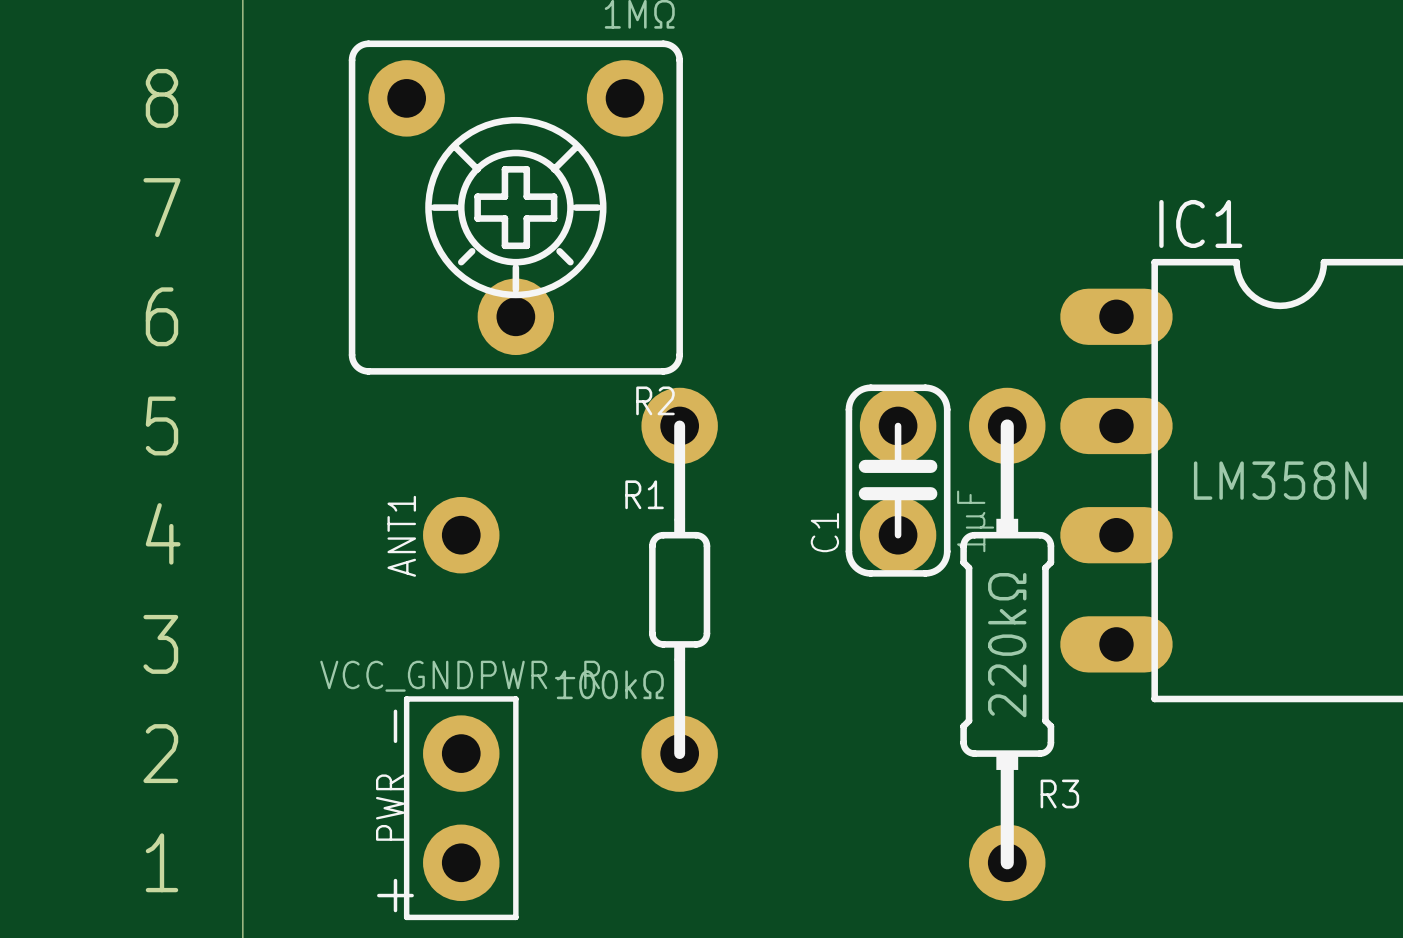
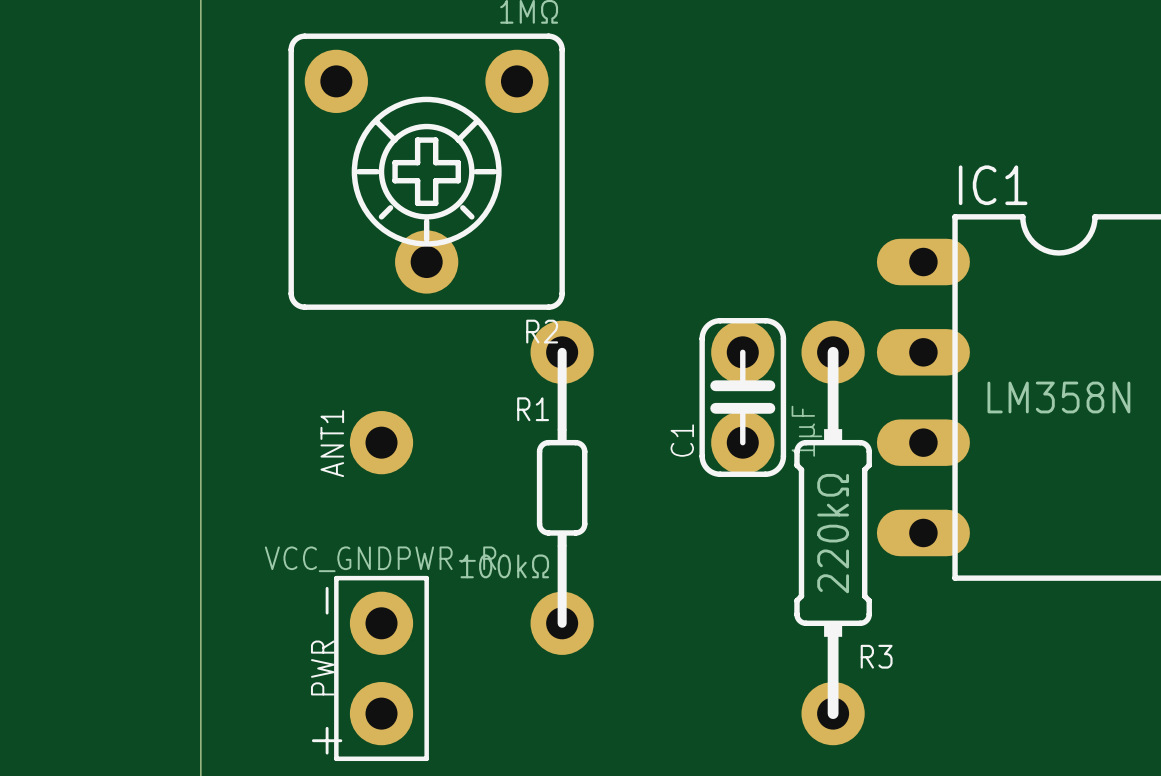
text: 8 (161, 98) -> none
text: 7 (161, 207) -> none
text: 6 (161, 316) -> none
text: 5 (161, 425) -> none
text: 4 (163, 533) -> none
text: 3 (160, 644) -> none
text: 2 (160, 753) -> none
text: 1 (161, 862) -> none

